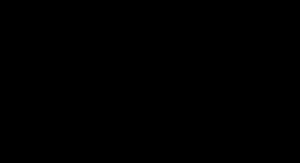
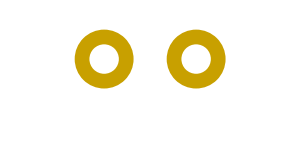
part: none -> (150, 59)

